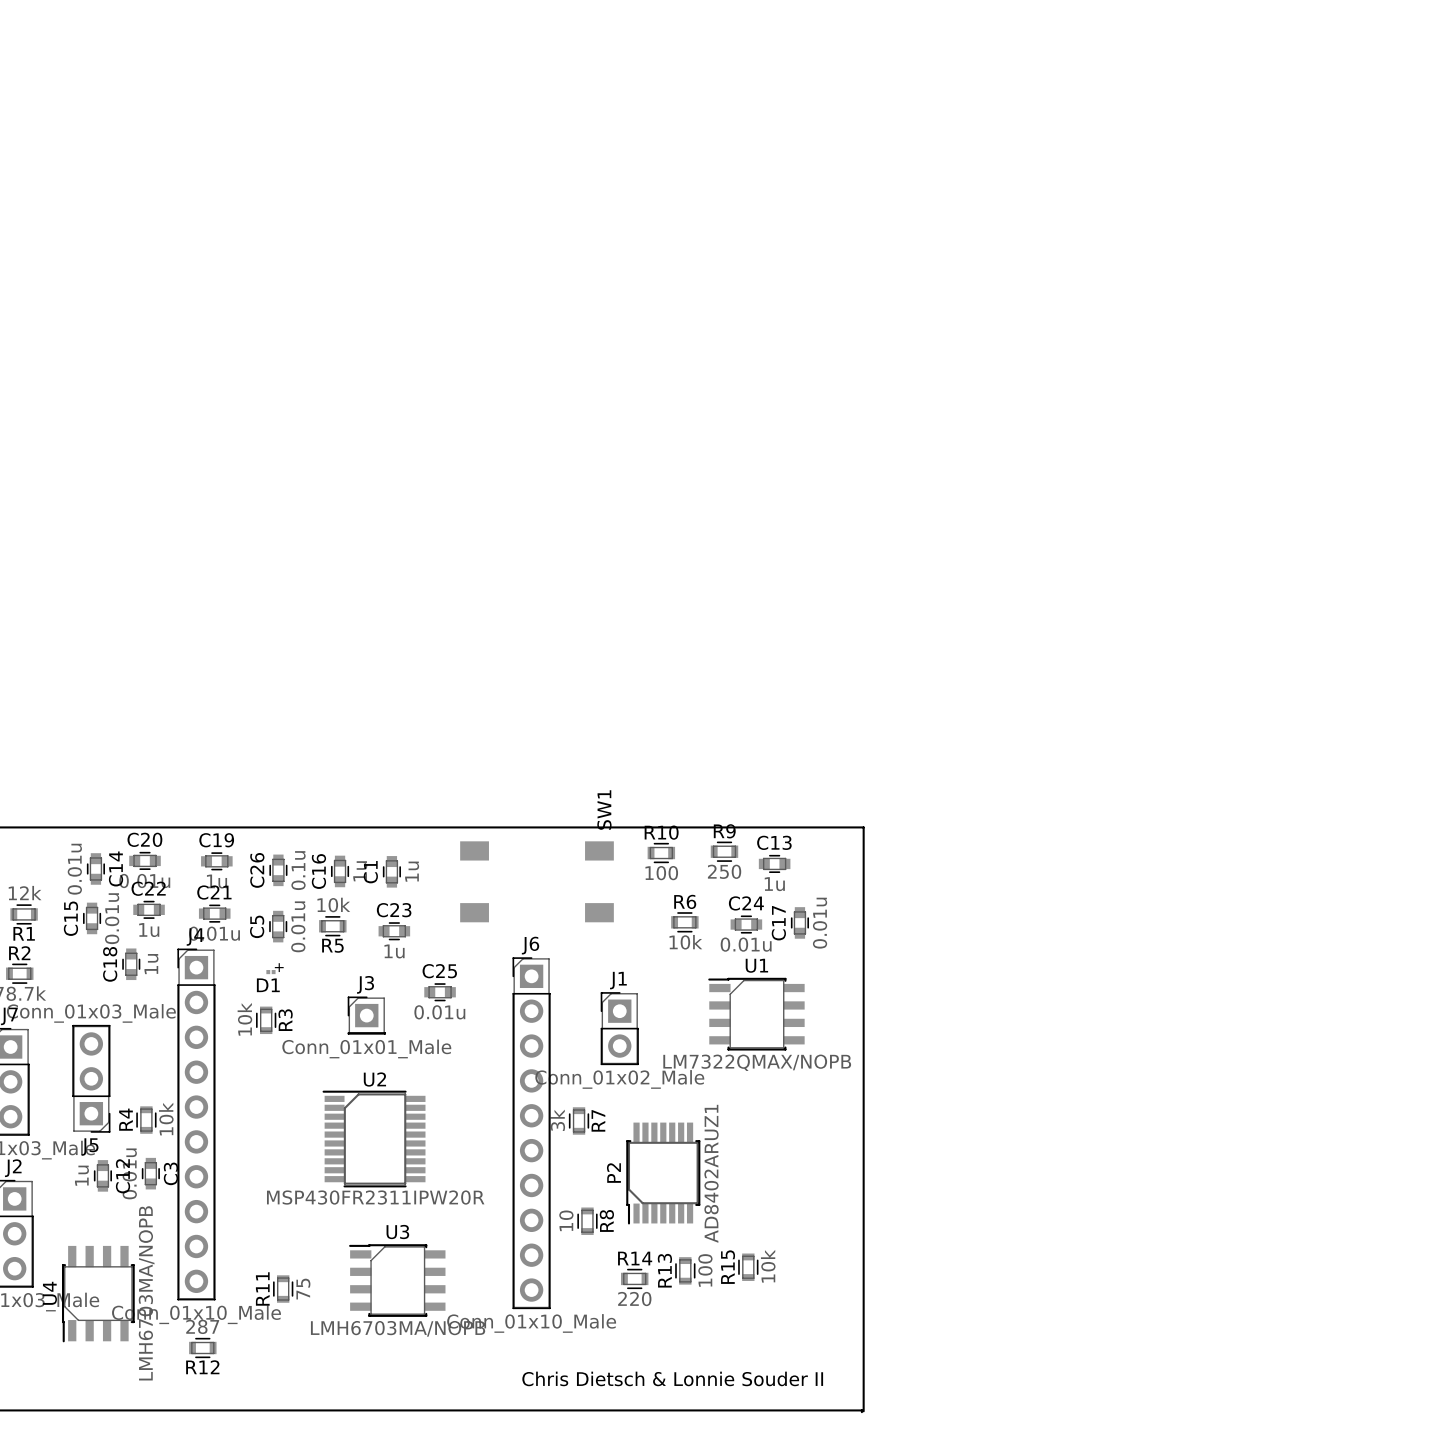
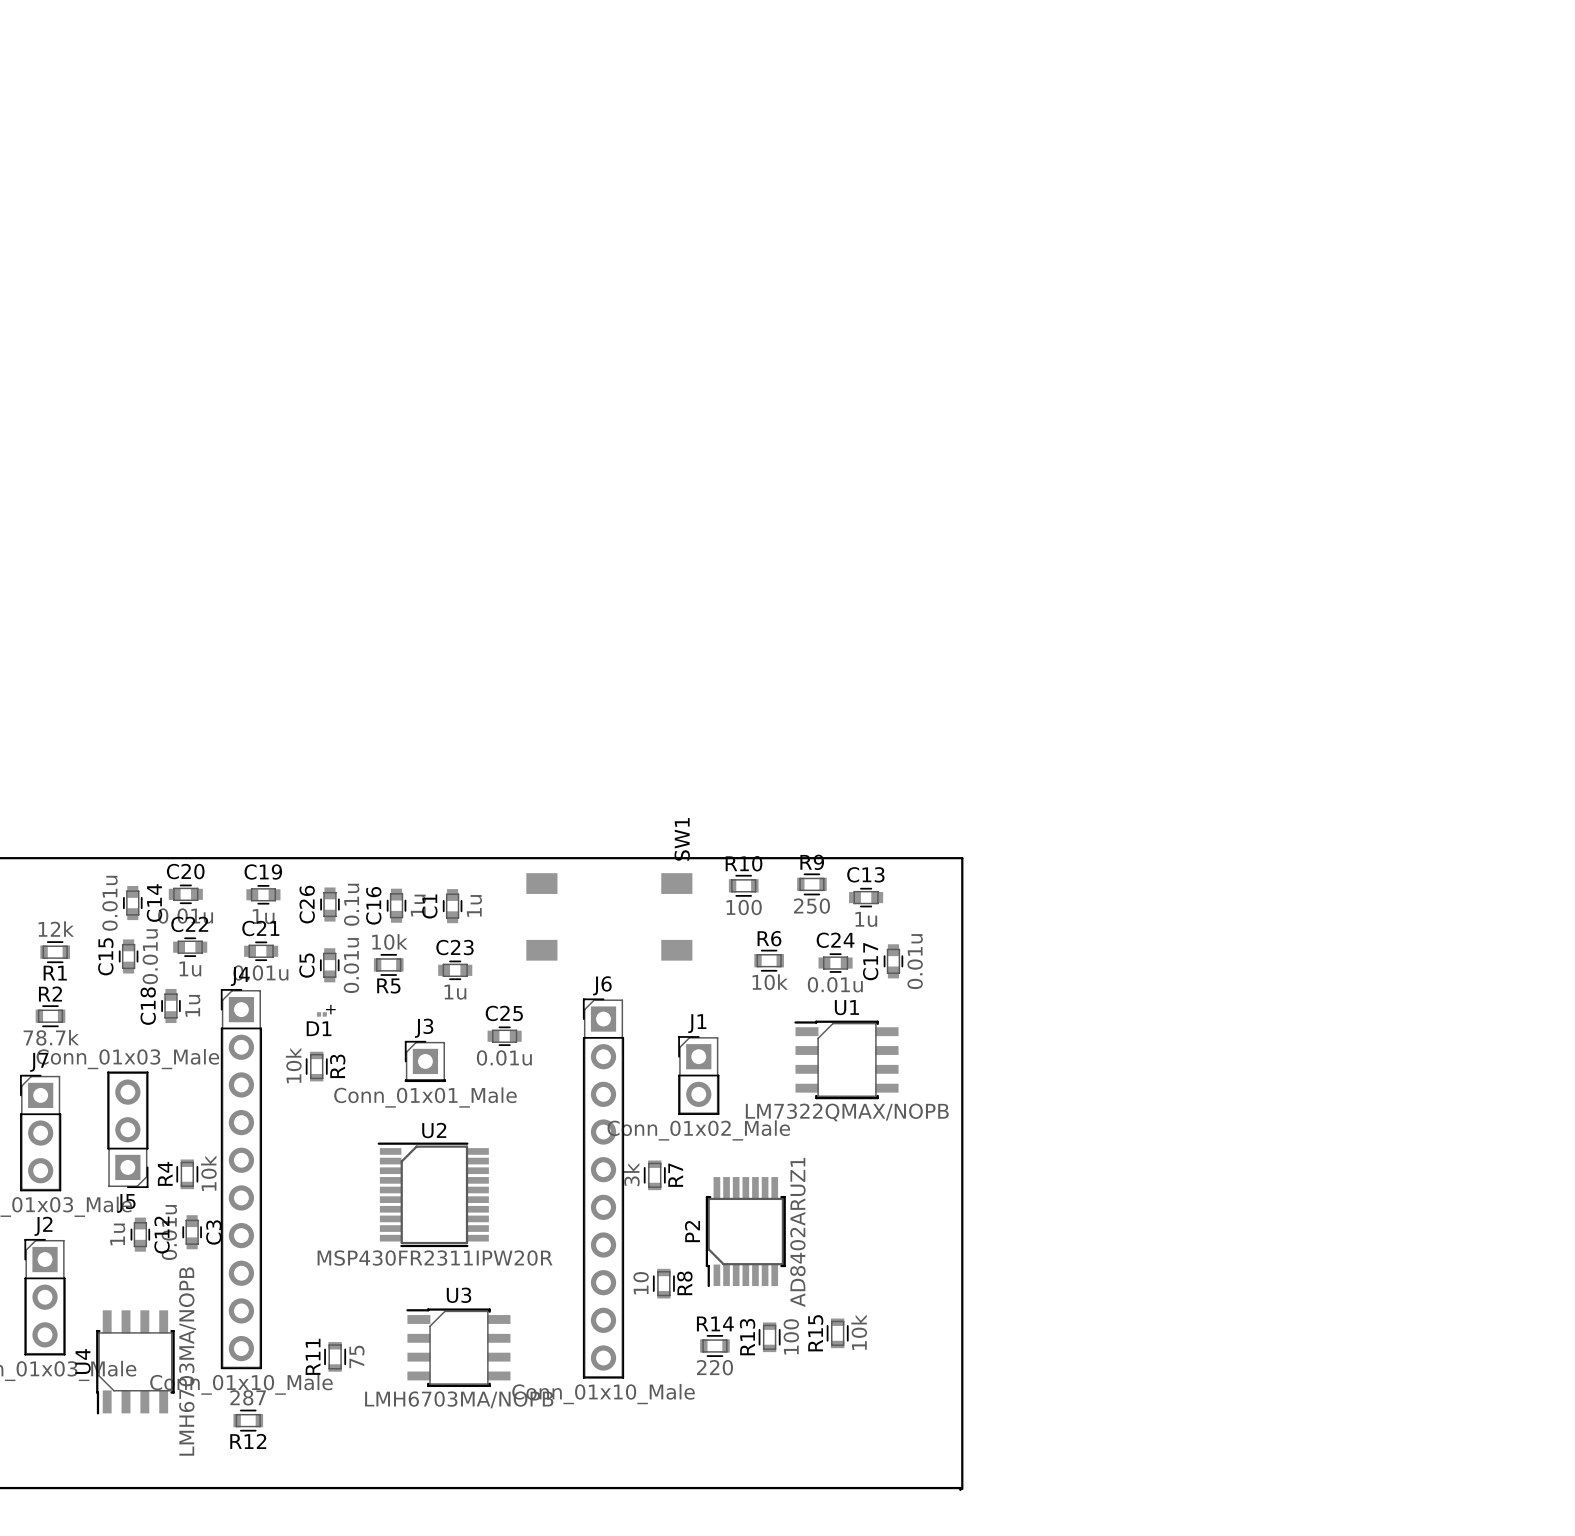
text: Chris Dietsch & Lonnie Souder II (672, 1378) -> none

